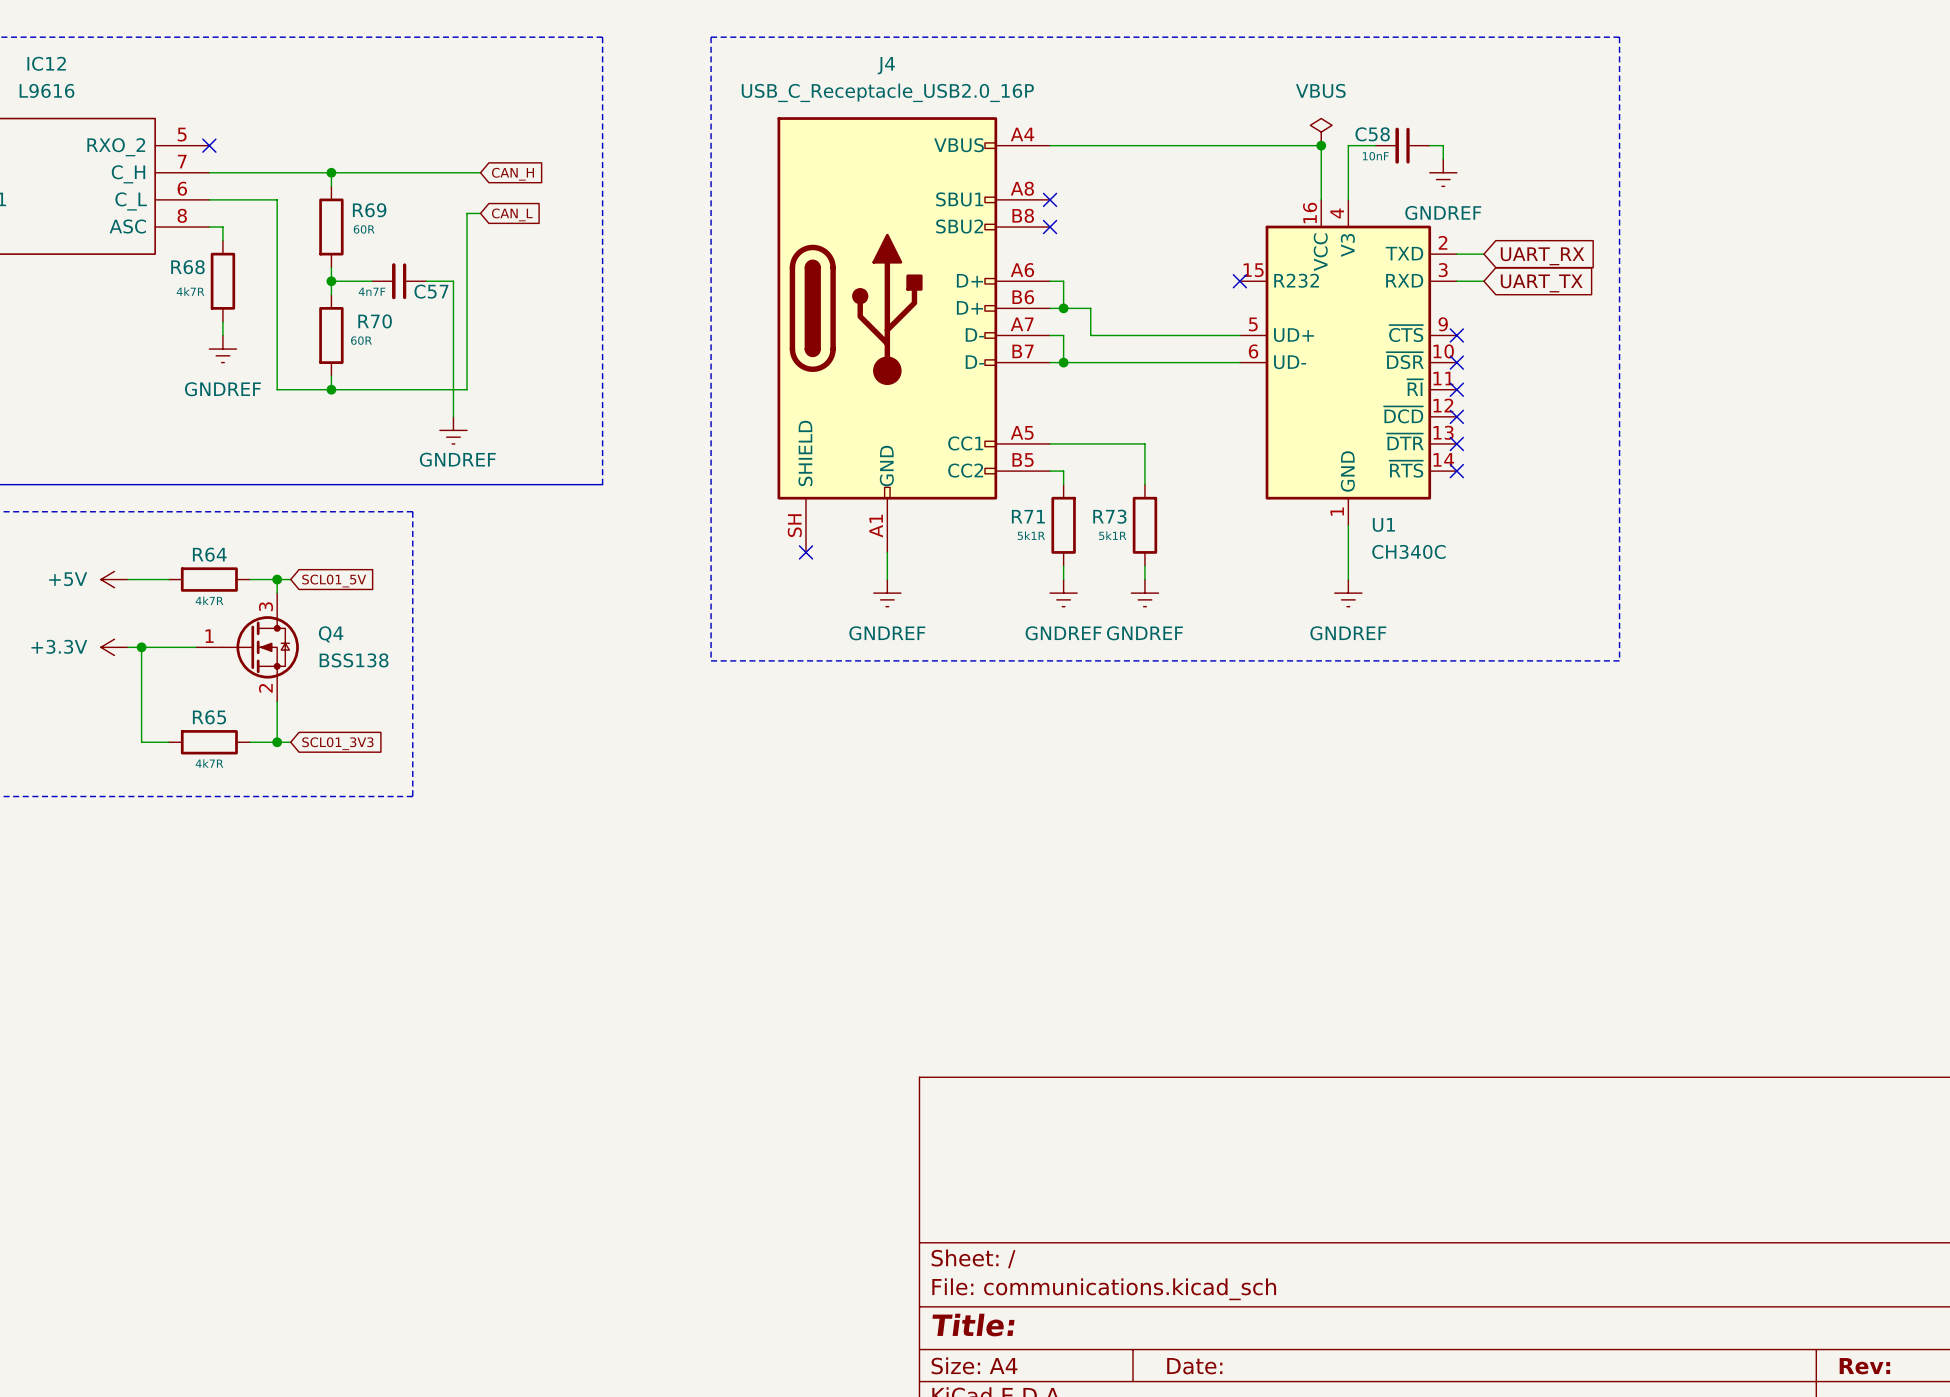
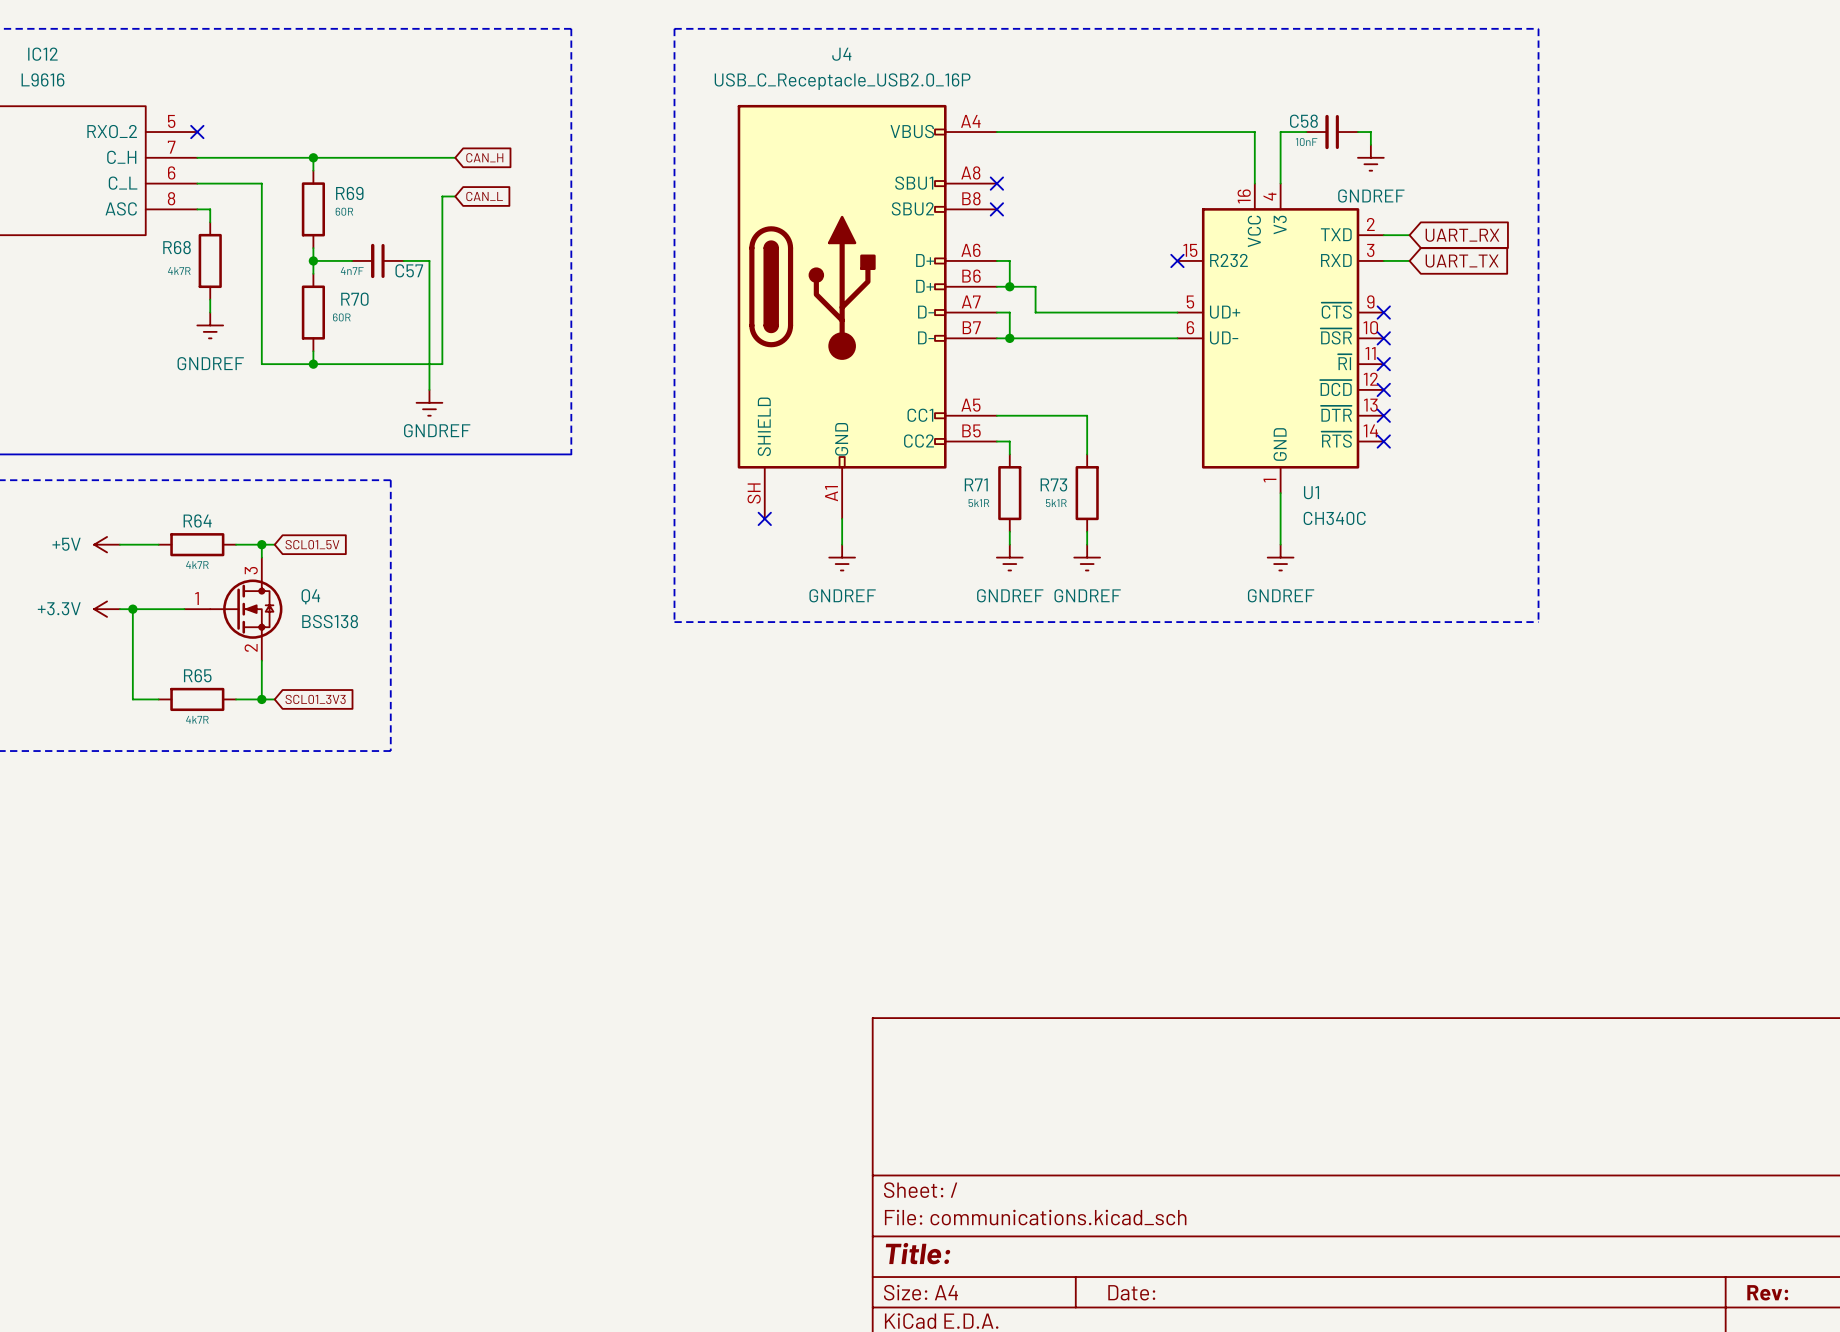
power symbol: VBUS (1321, 132) -> none
junction: (1321, 145) -> none

